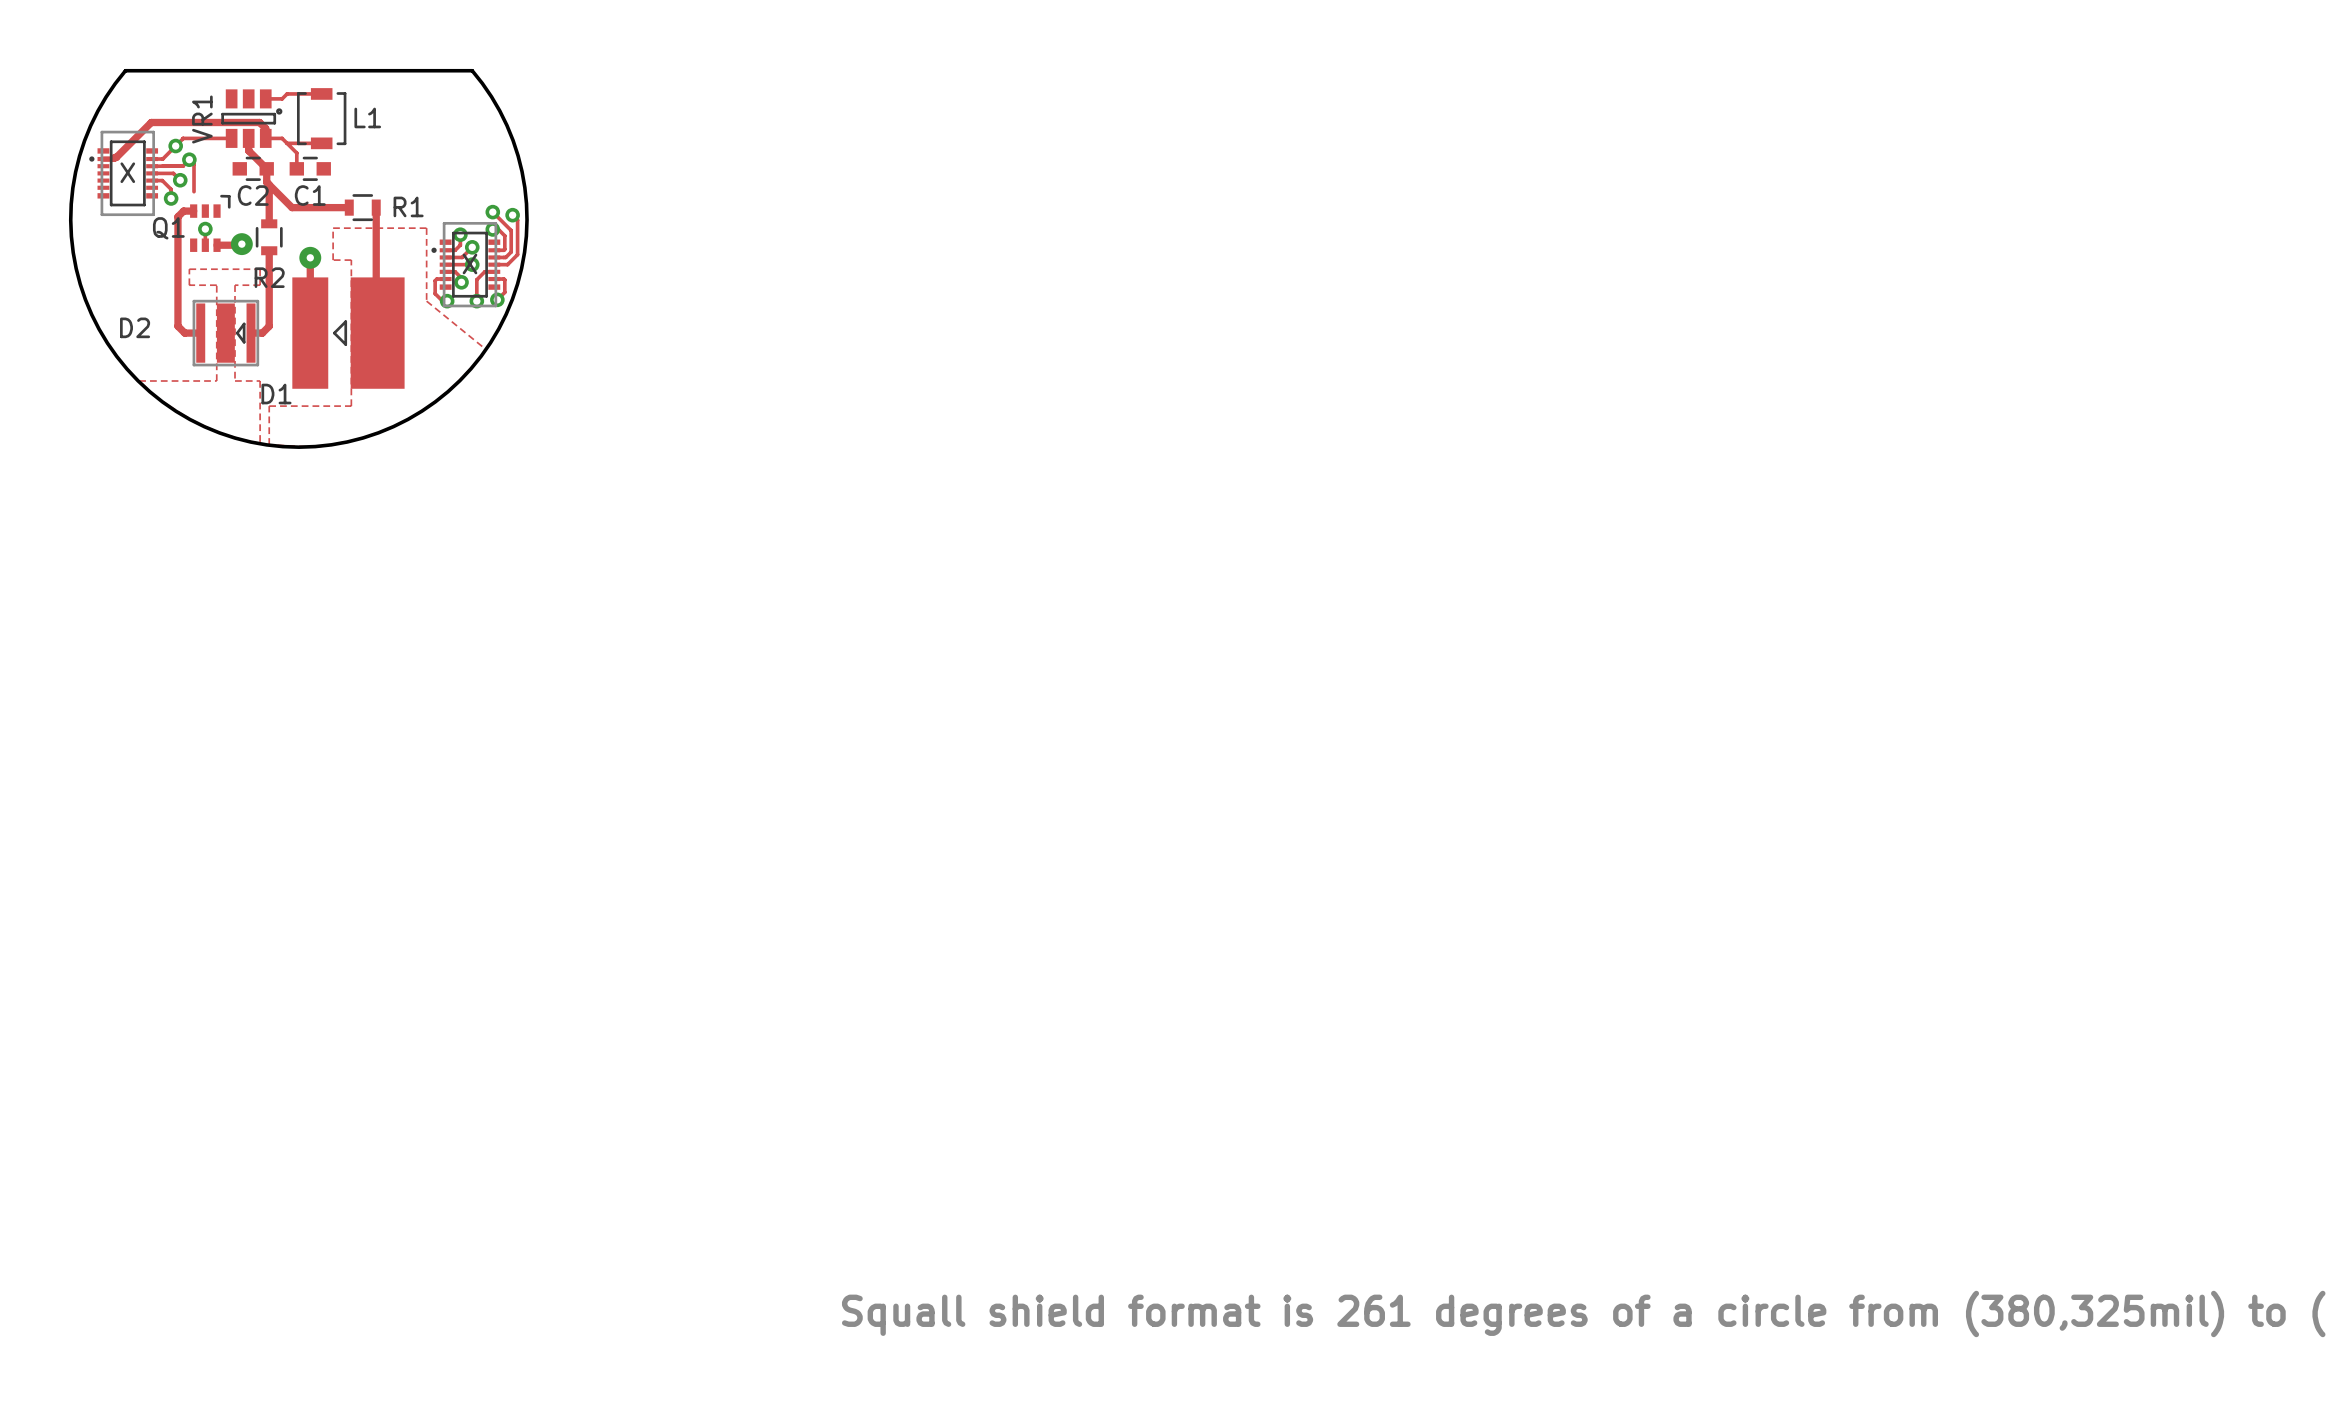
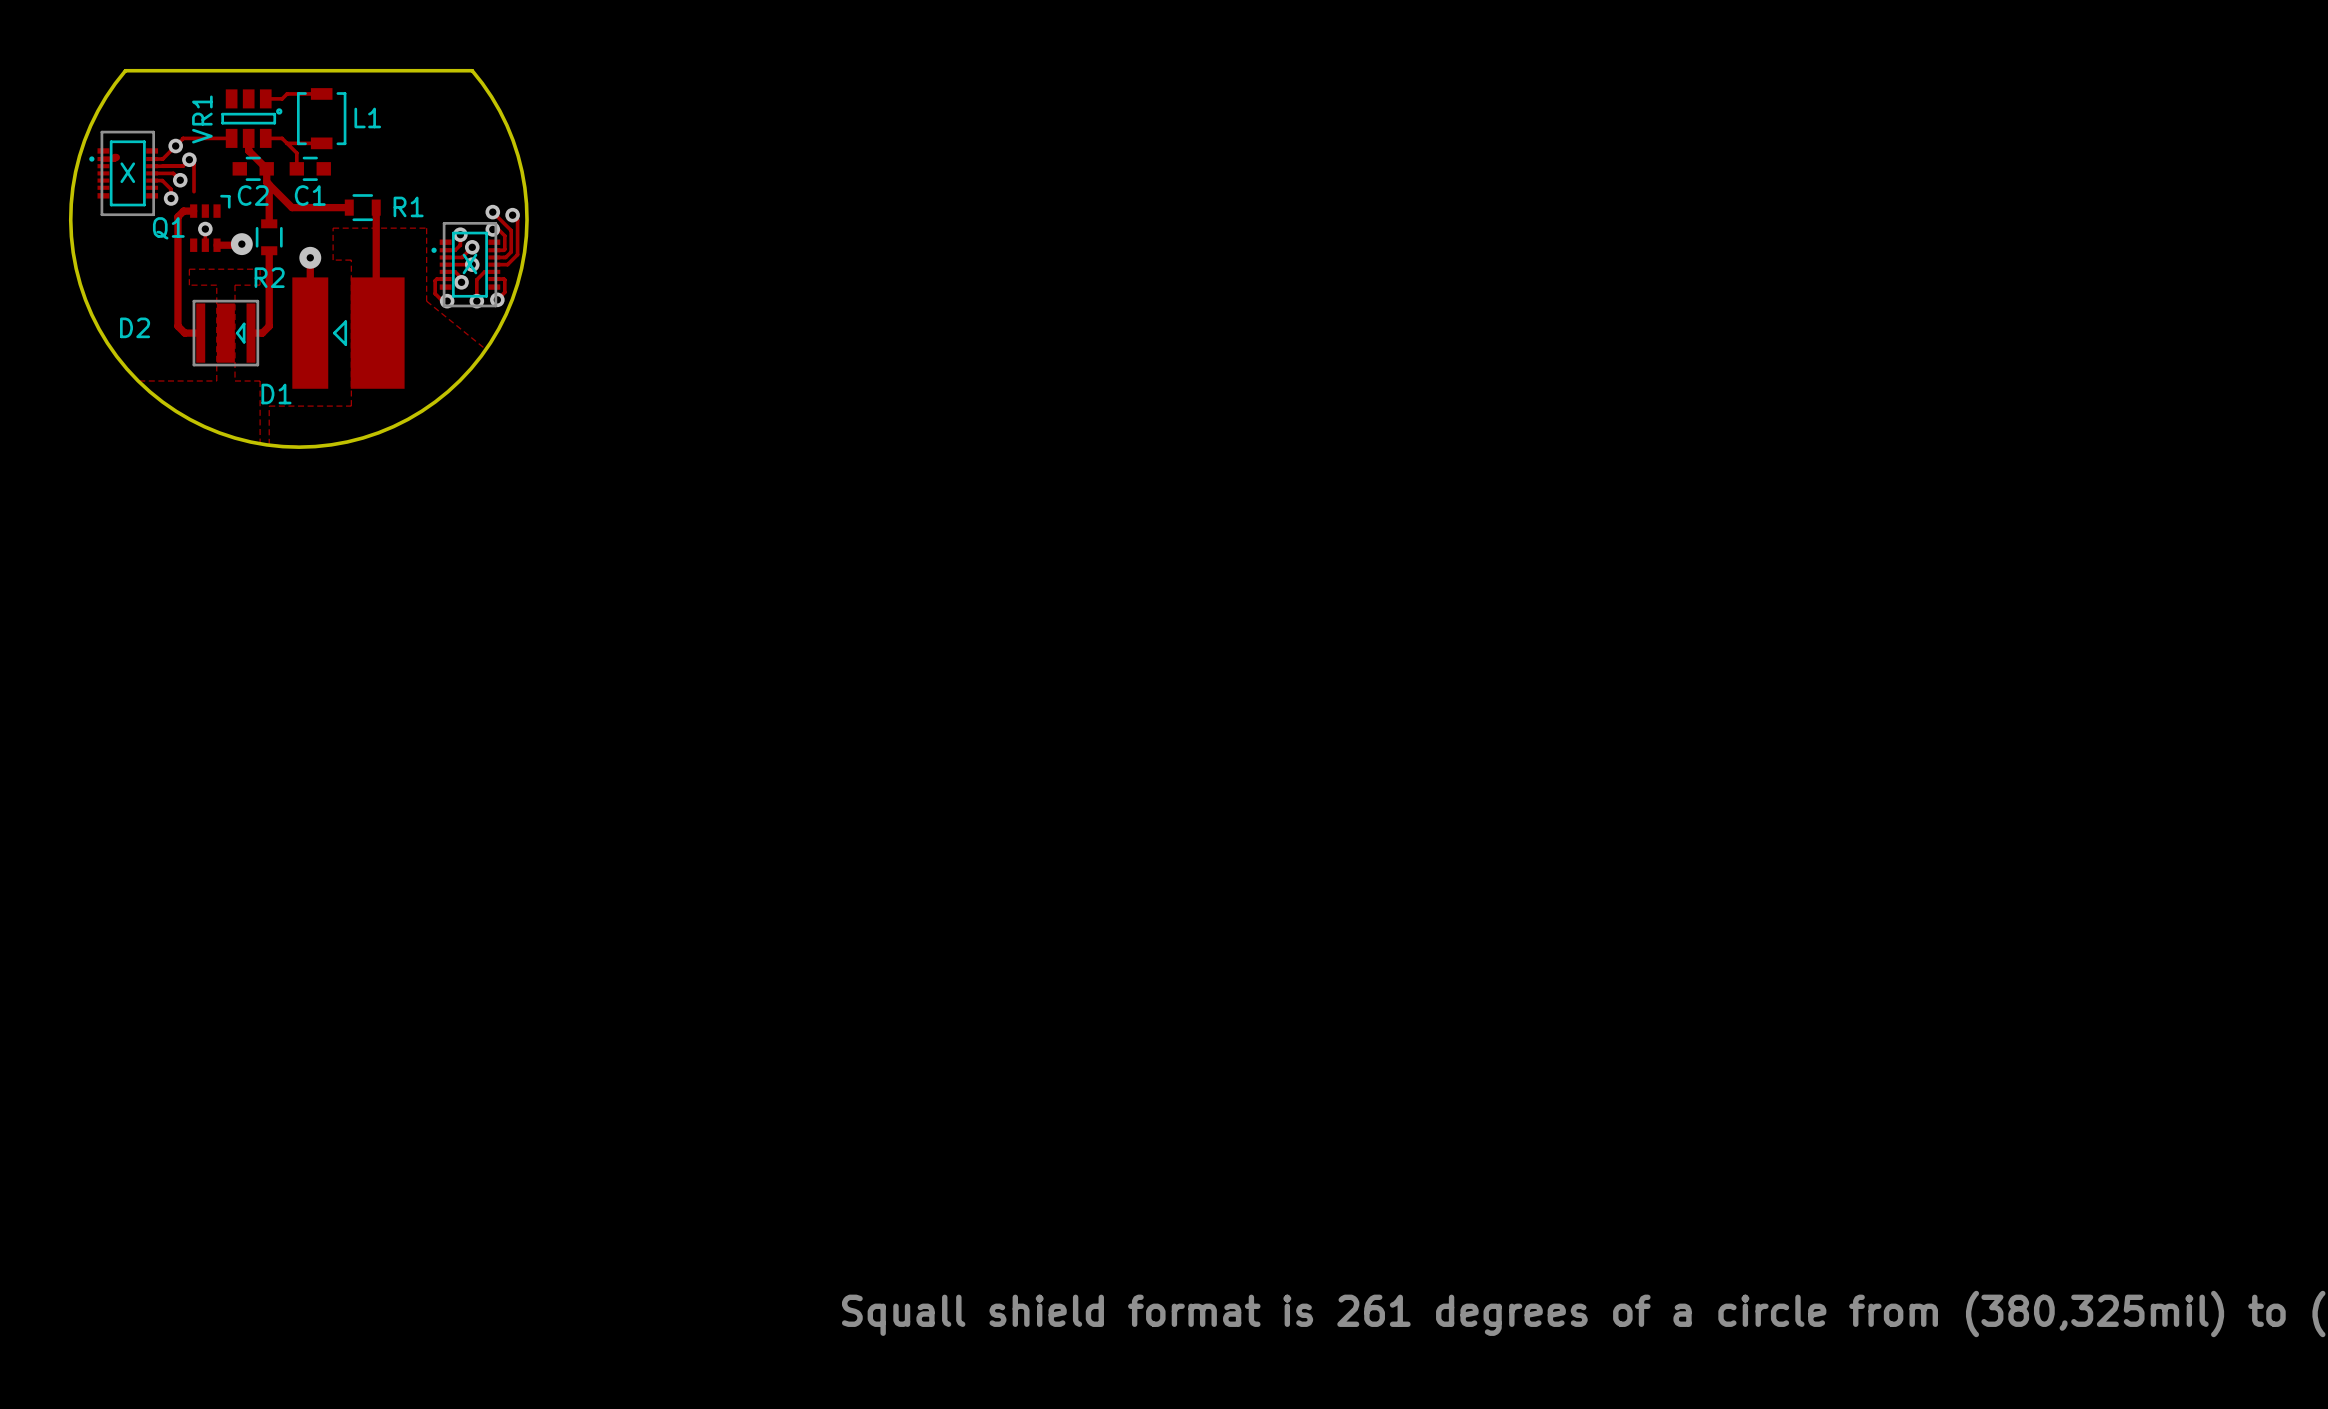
track: (265, 138) (265, 128) (259, 122) (151, 122) (116, 157) -> none

